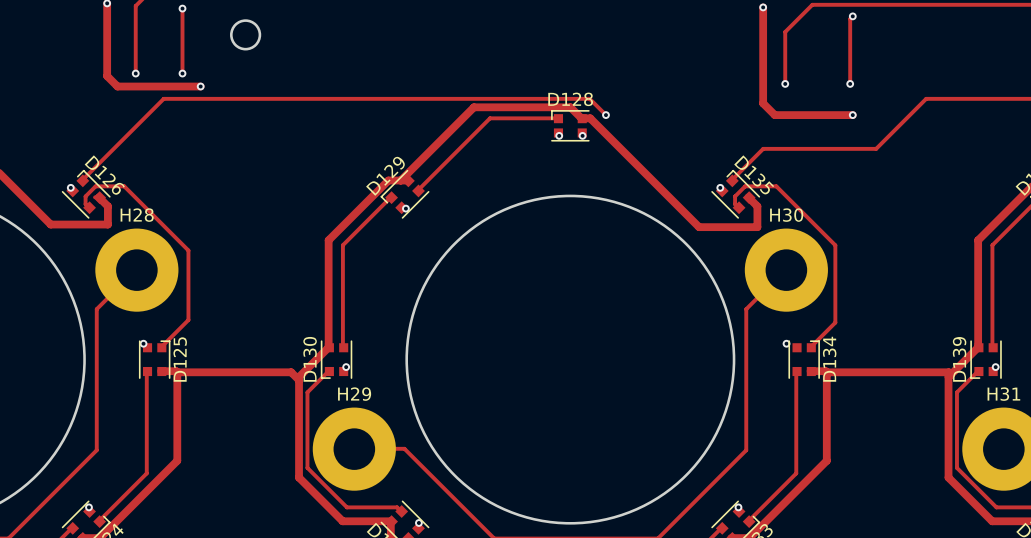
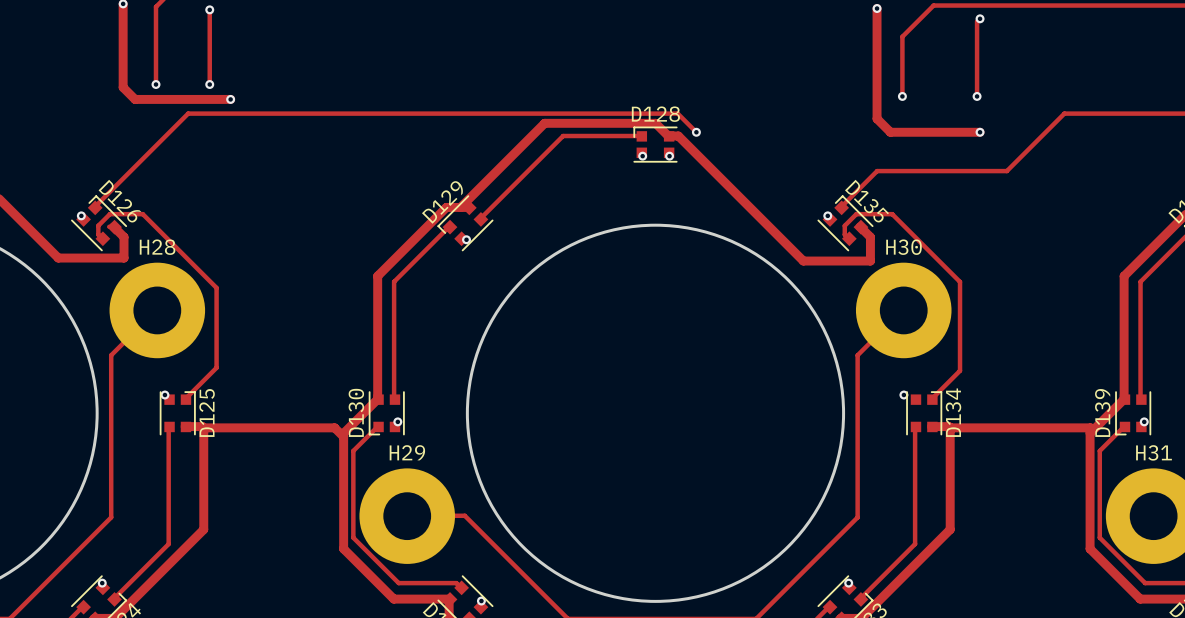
round board edge: [230, 19, 262, 51] -> none

